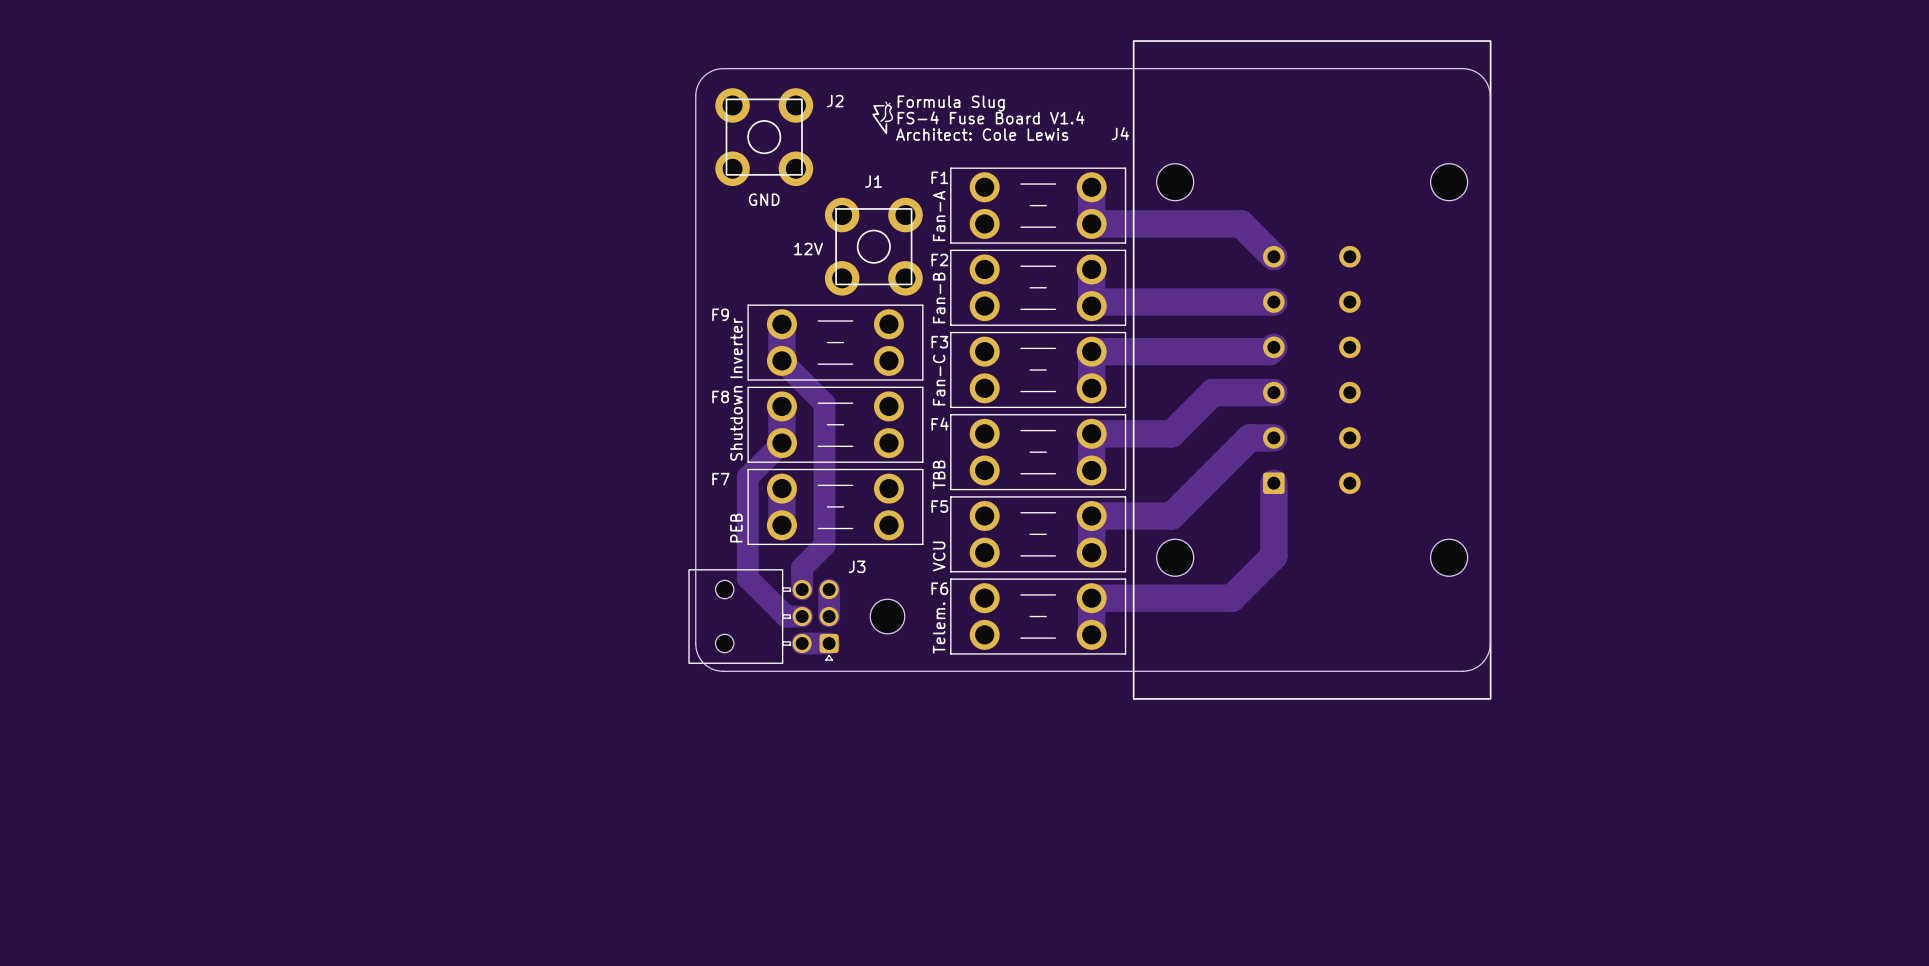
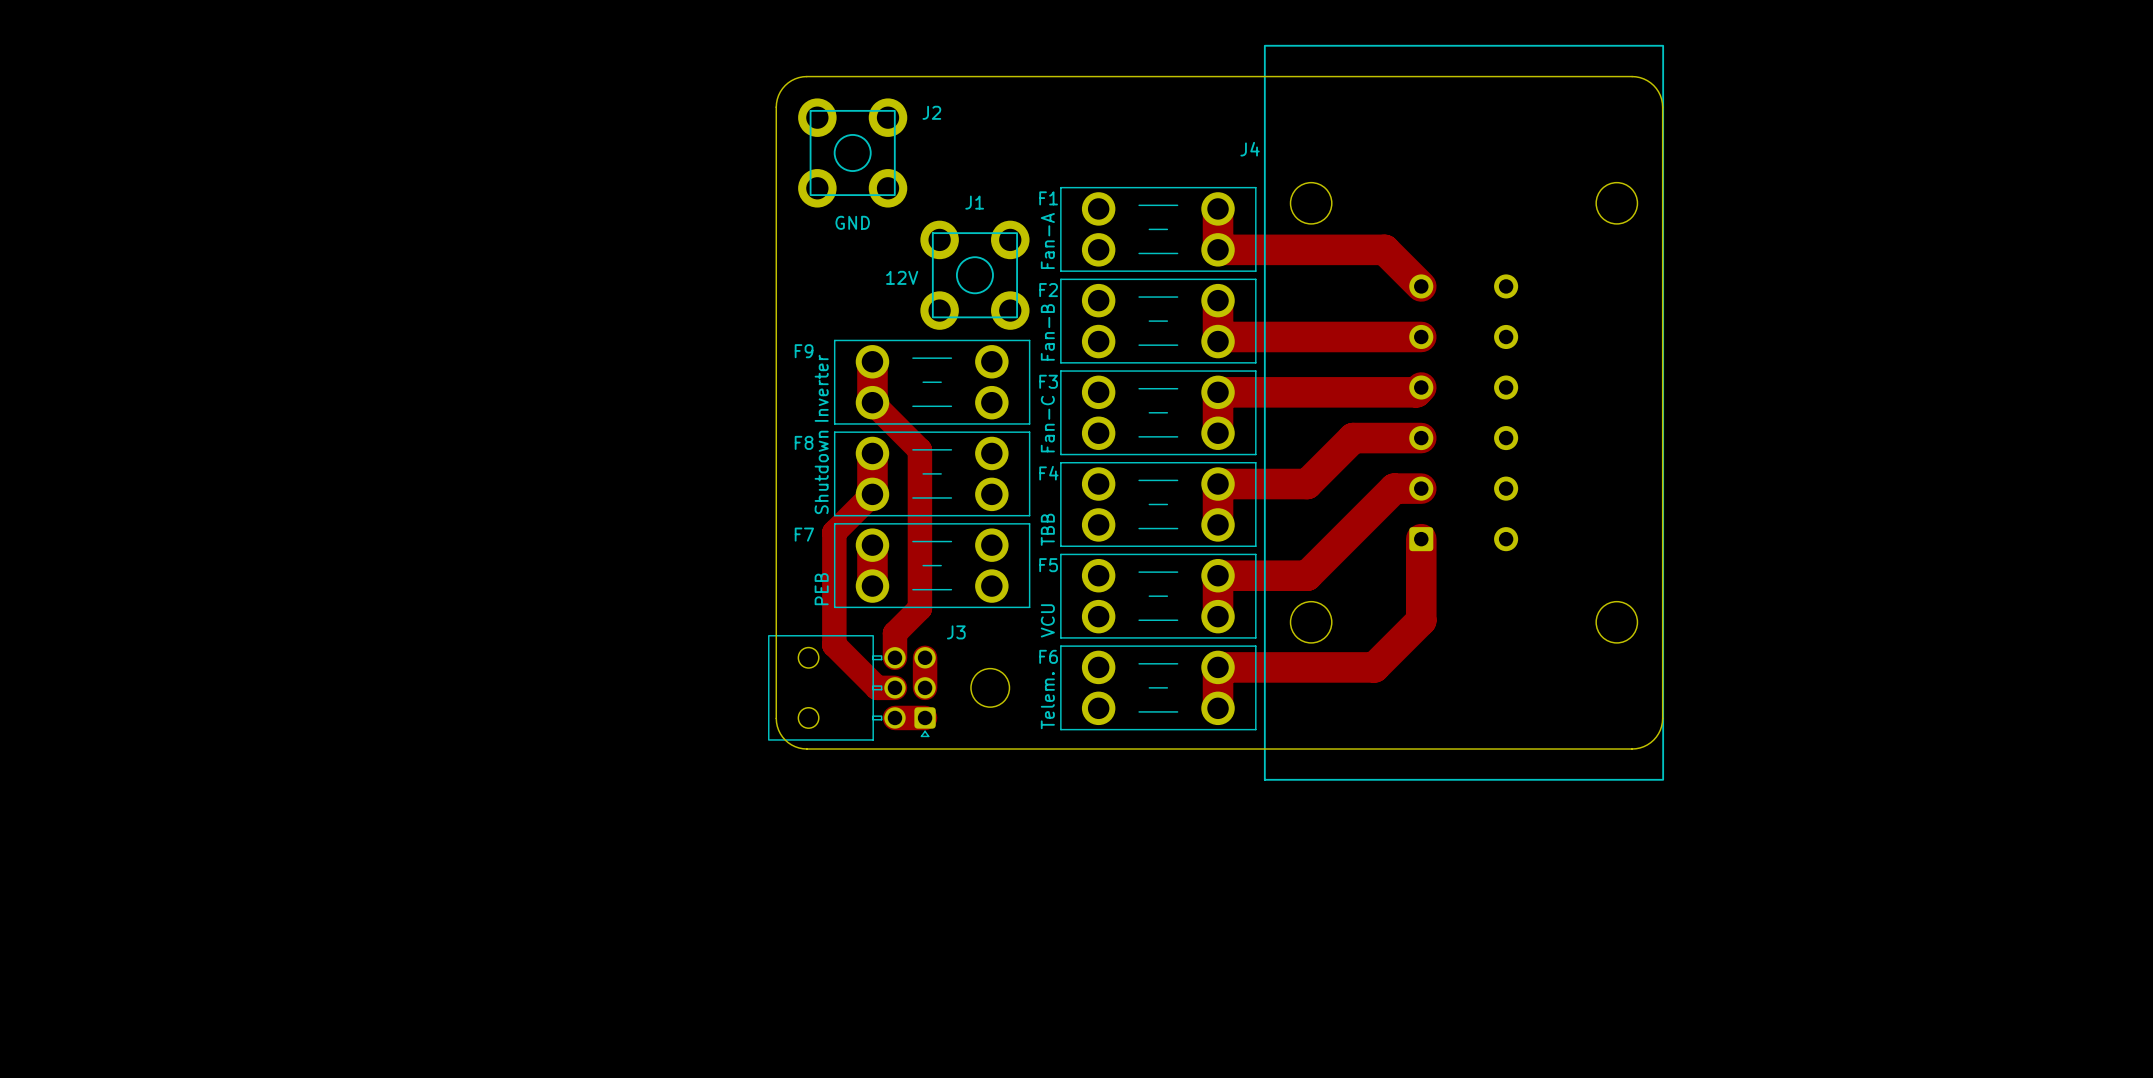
drawing: [872, 101, 894, 135] -> none

